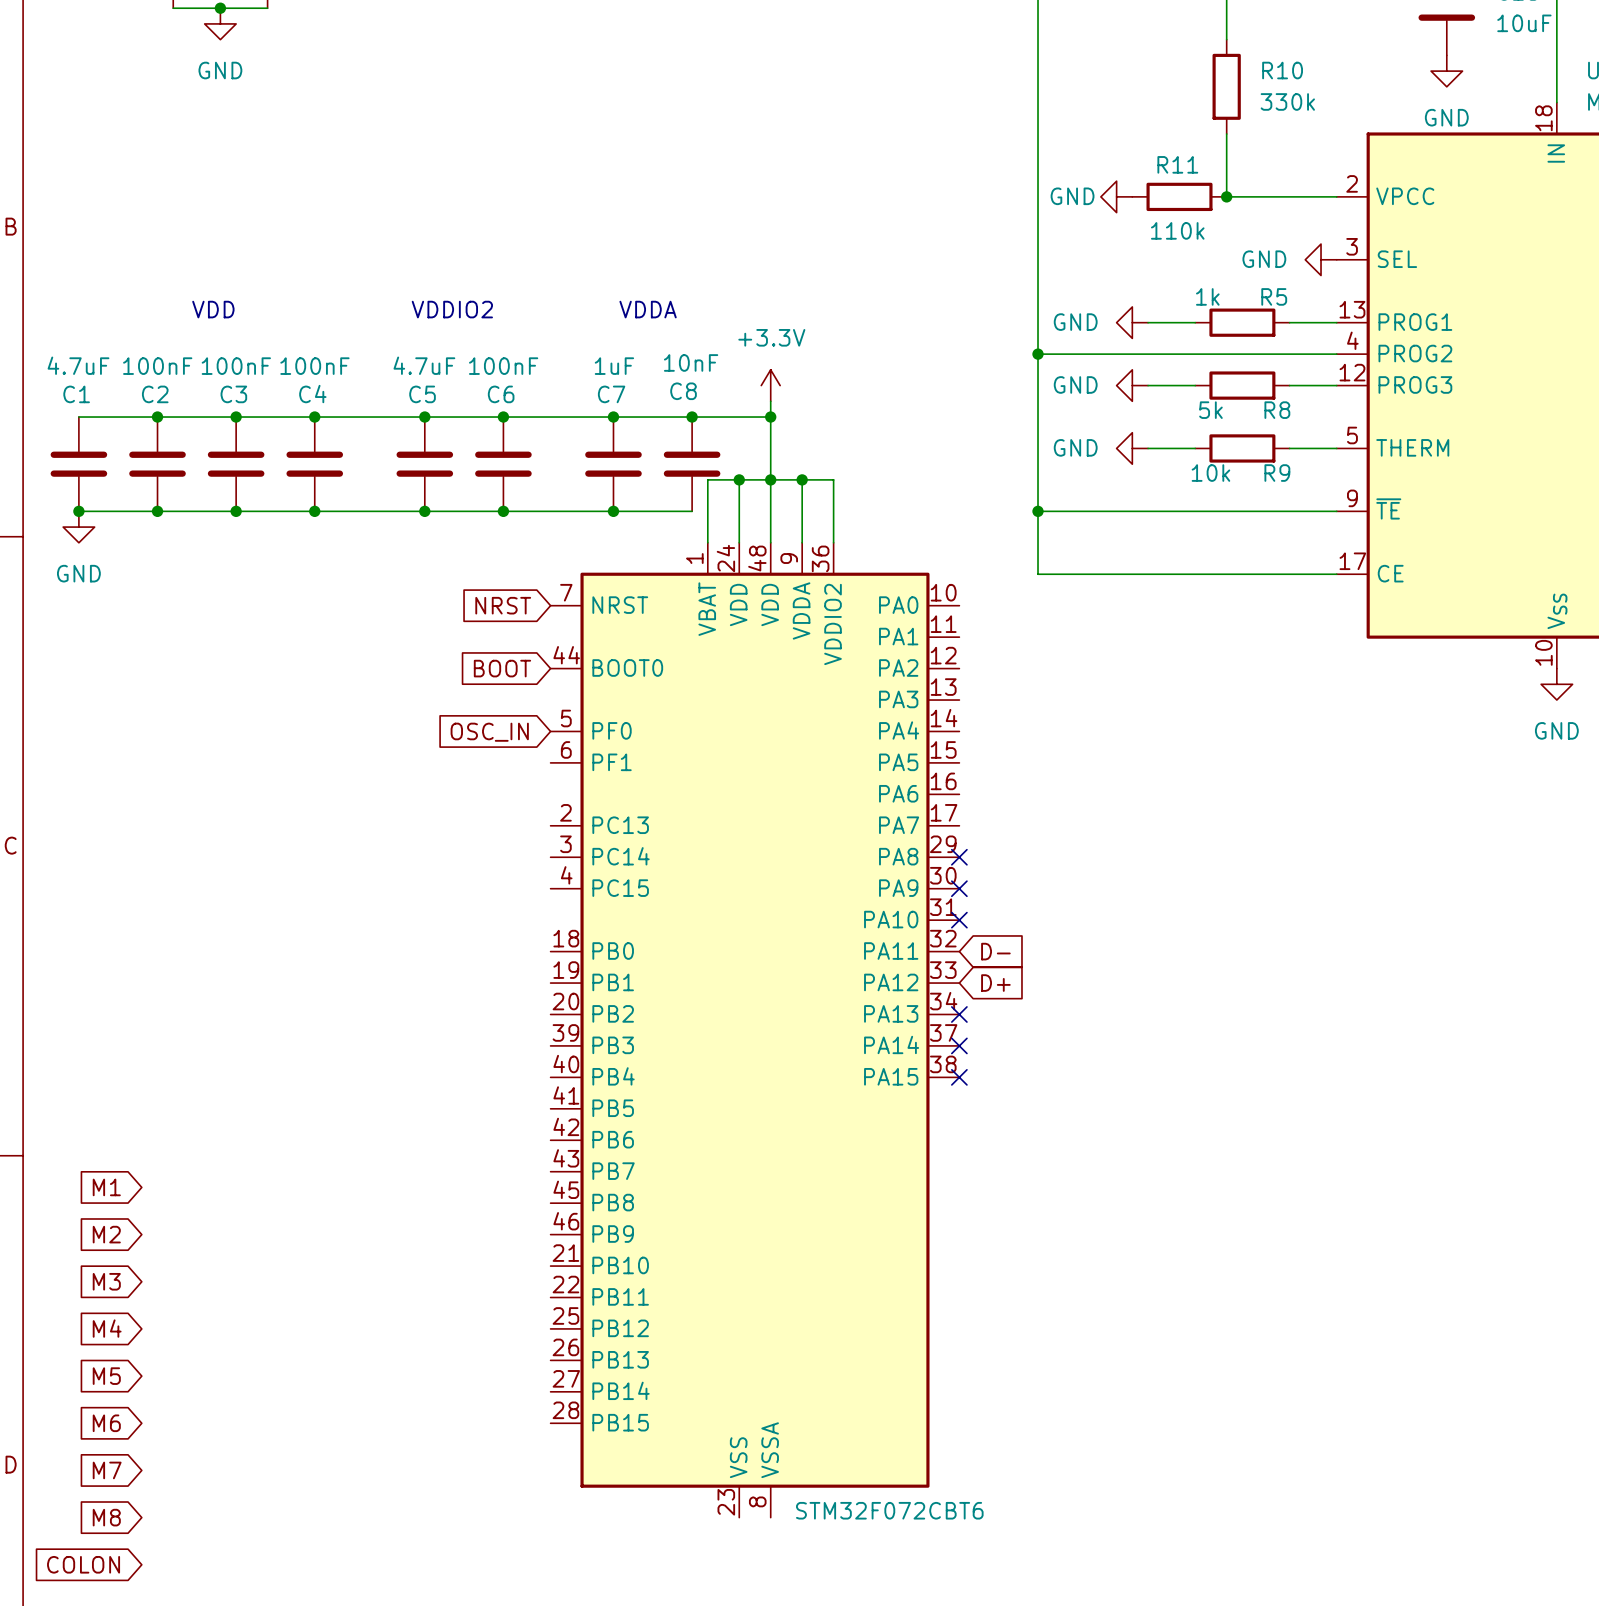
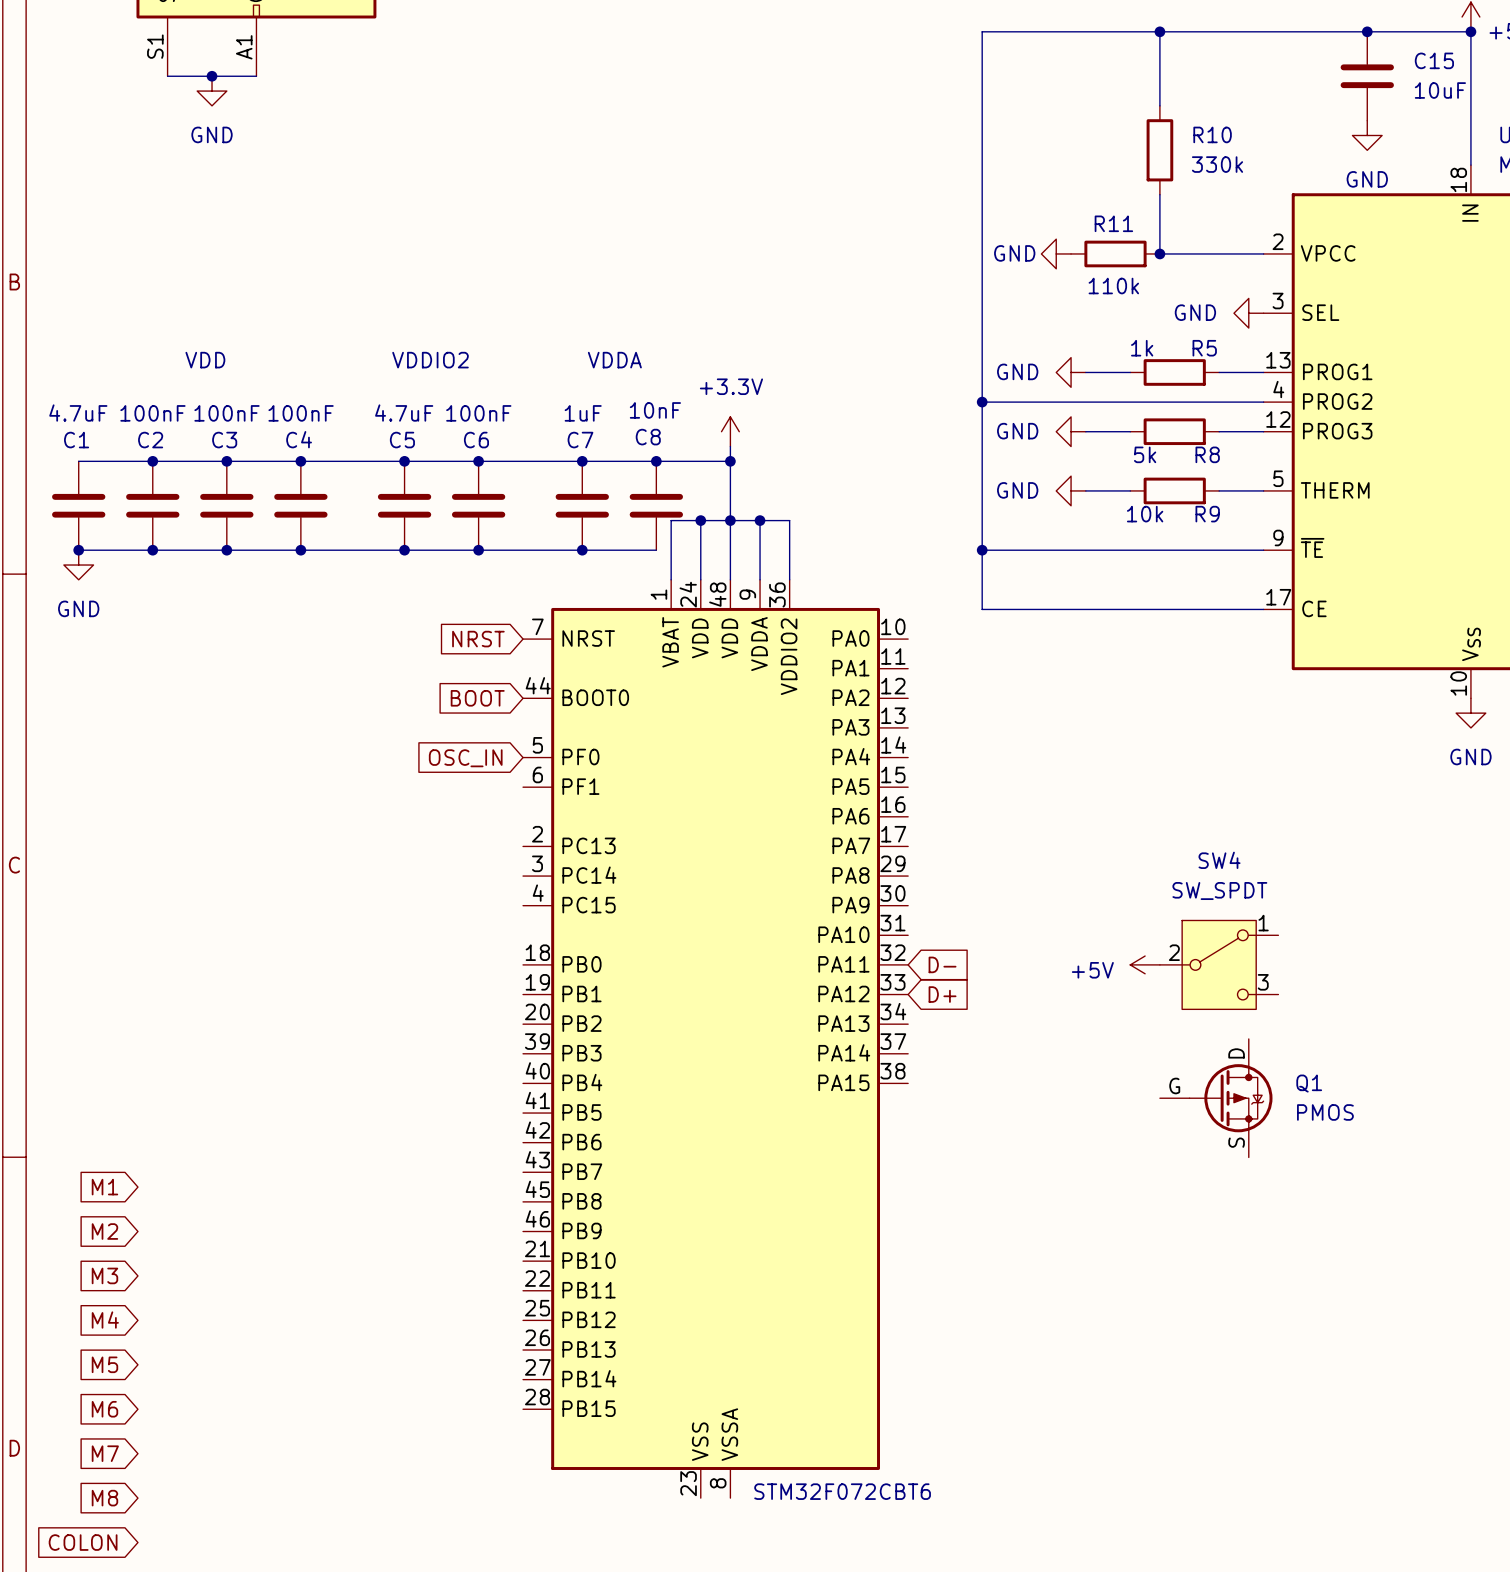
no-connect mark: (959, 857) -> none
no-connect mark: (959, 888) -> none
no-connect mark: (959, 920) -> none
power symbol: none -> +5V (1145, 964)
SW4: none -> SW_SPDT (1219, 964)
no-connect mark: (959, 1014) -> none
no-connect mark: (959, 1045) -> none
no-connect mark: (959, 1077) -> none
Q1: none -> PMOS (1216, 1098)

